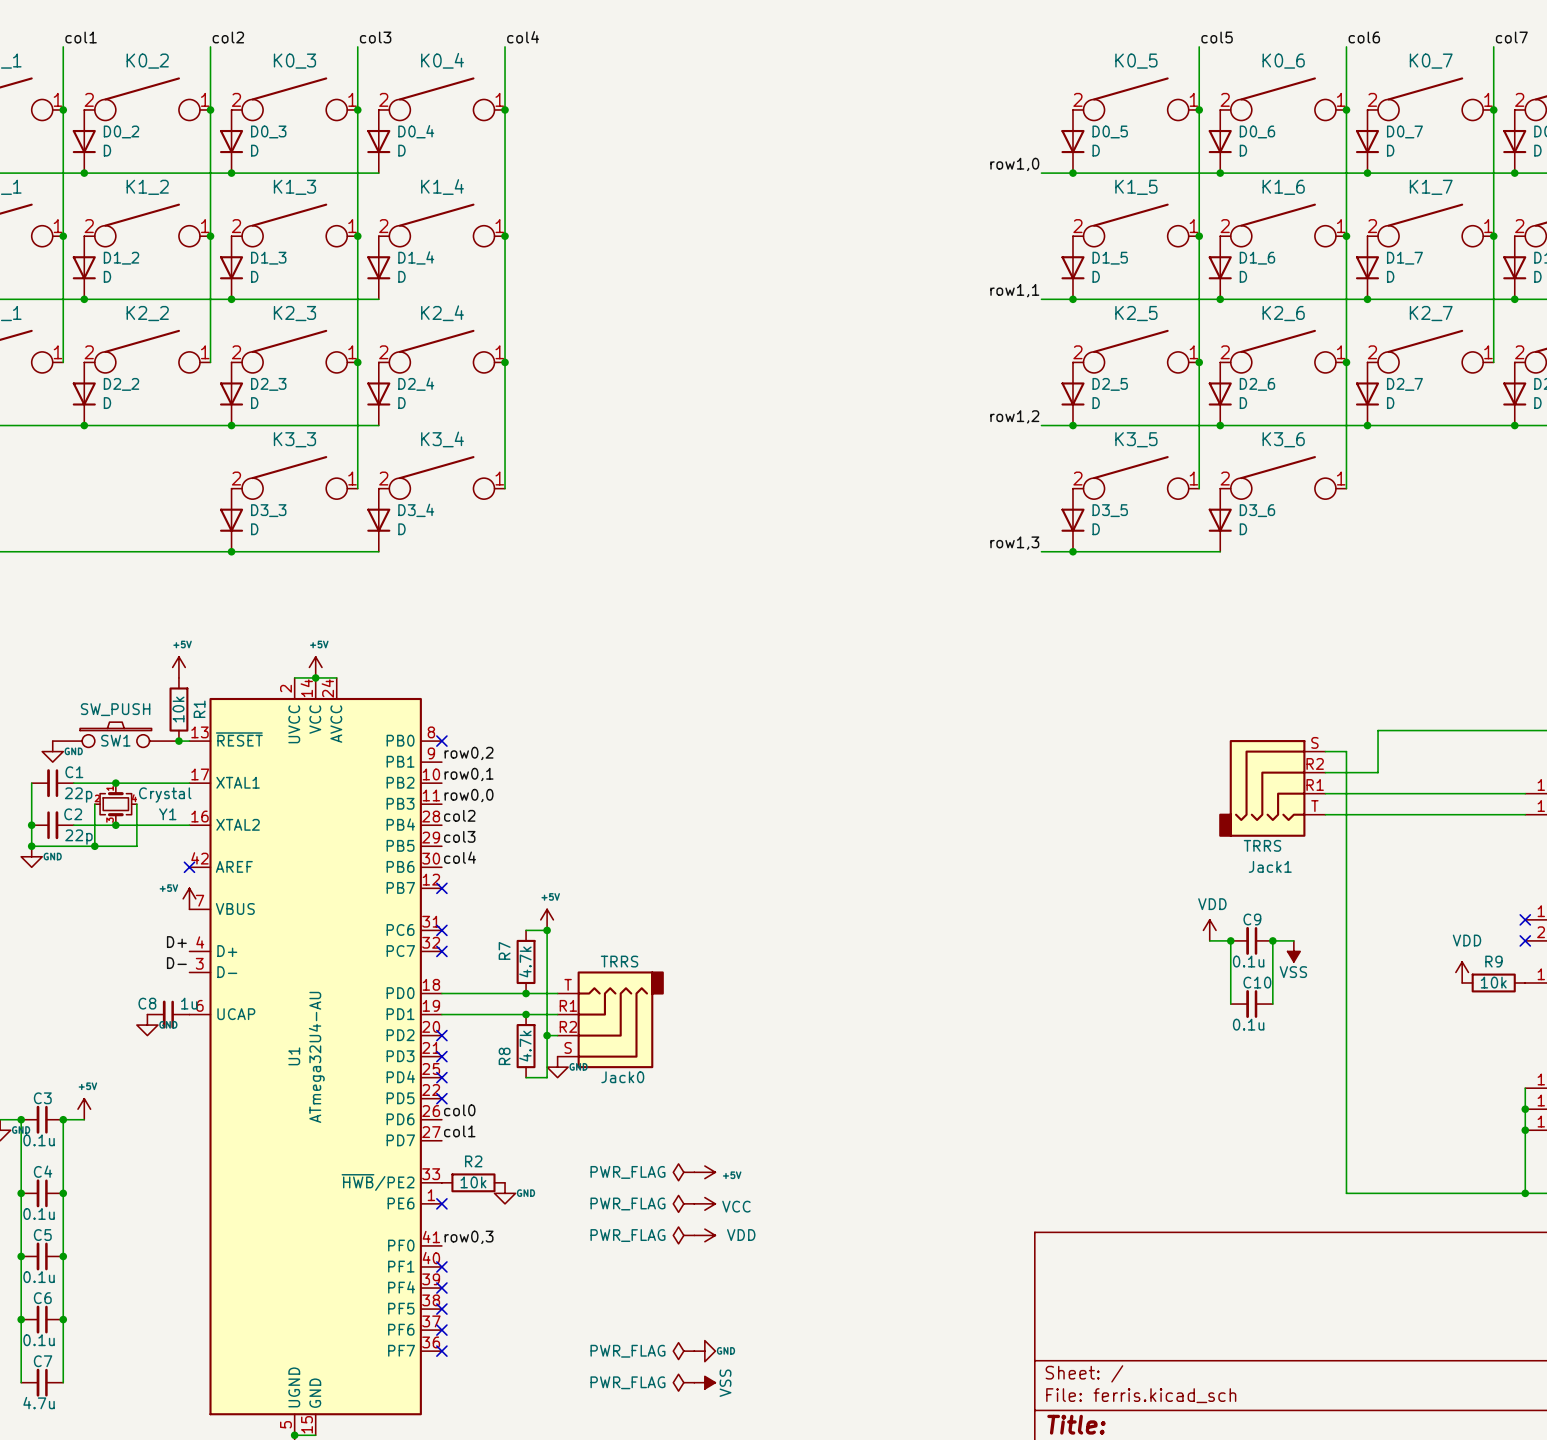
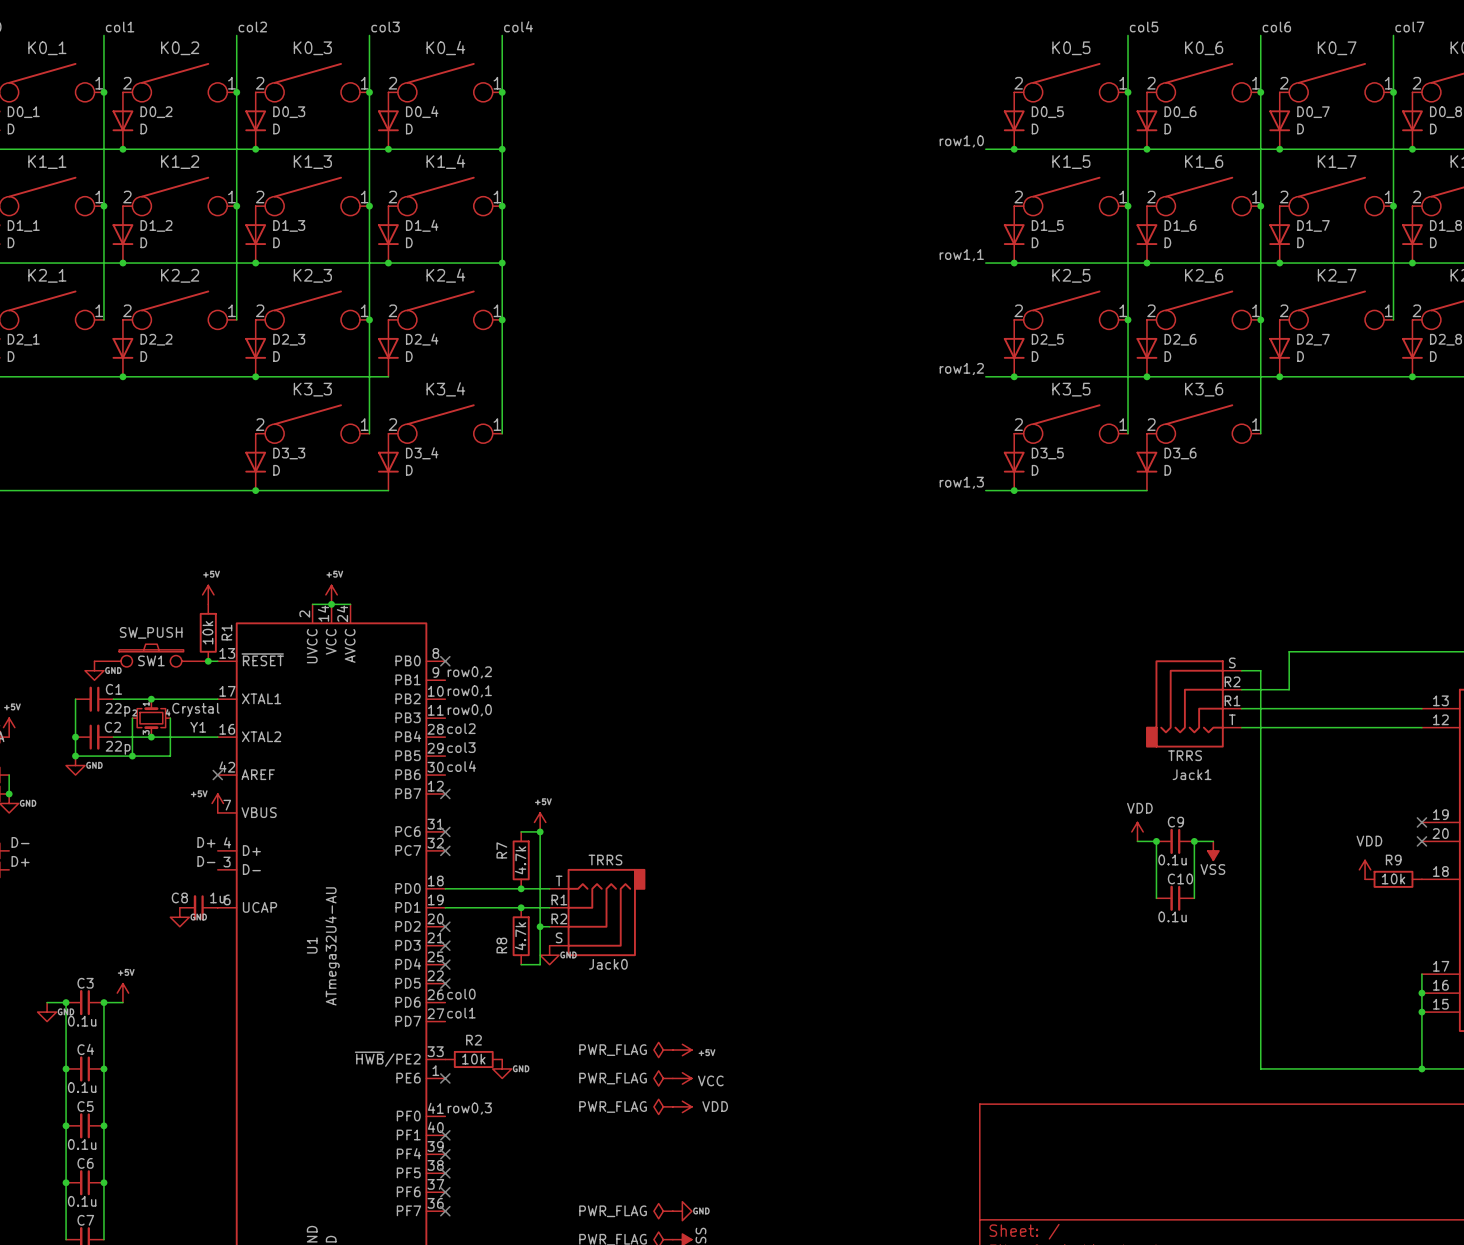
wire: none -> (388, 149) (502, 149)
junction: none -> (388, 149)
junction: none -> (502, 149)
wire: none -> (388, 263) (502, 263)
junction: none -> (388, 263)
junction: none -> (502, 263)

